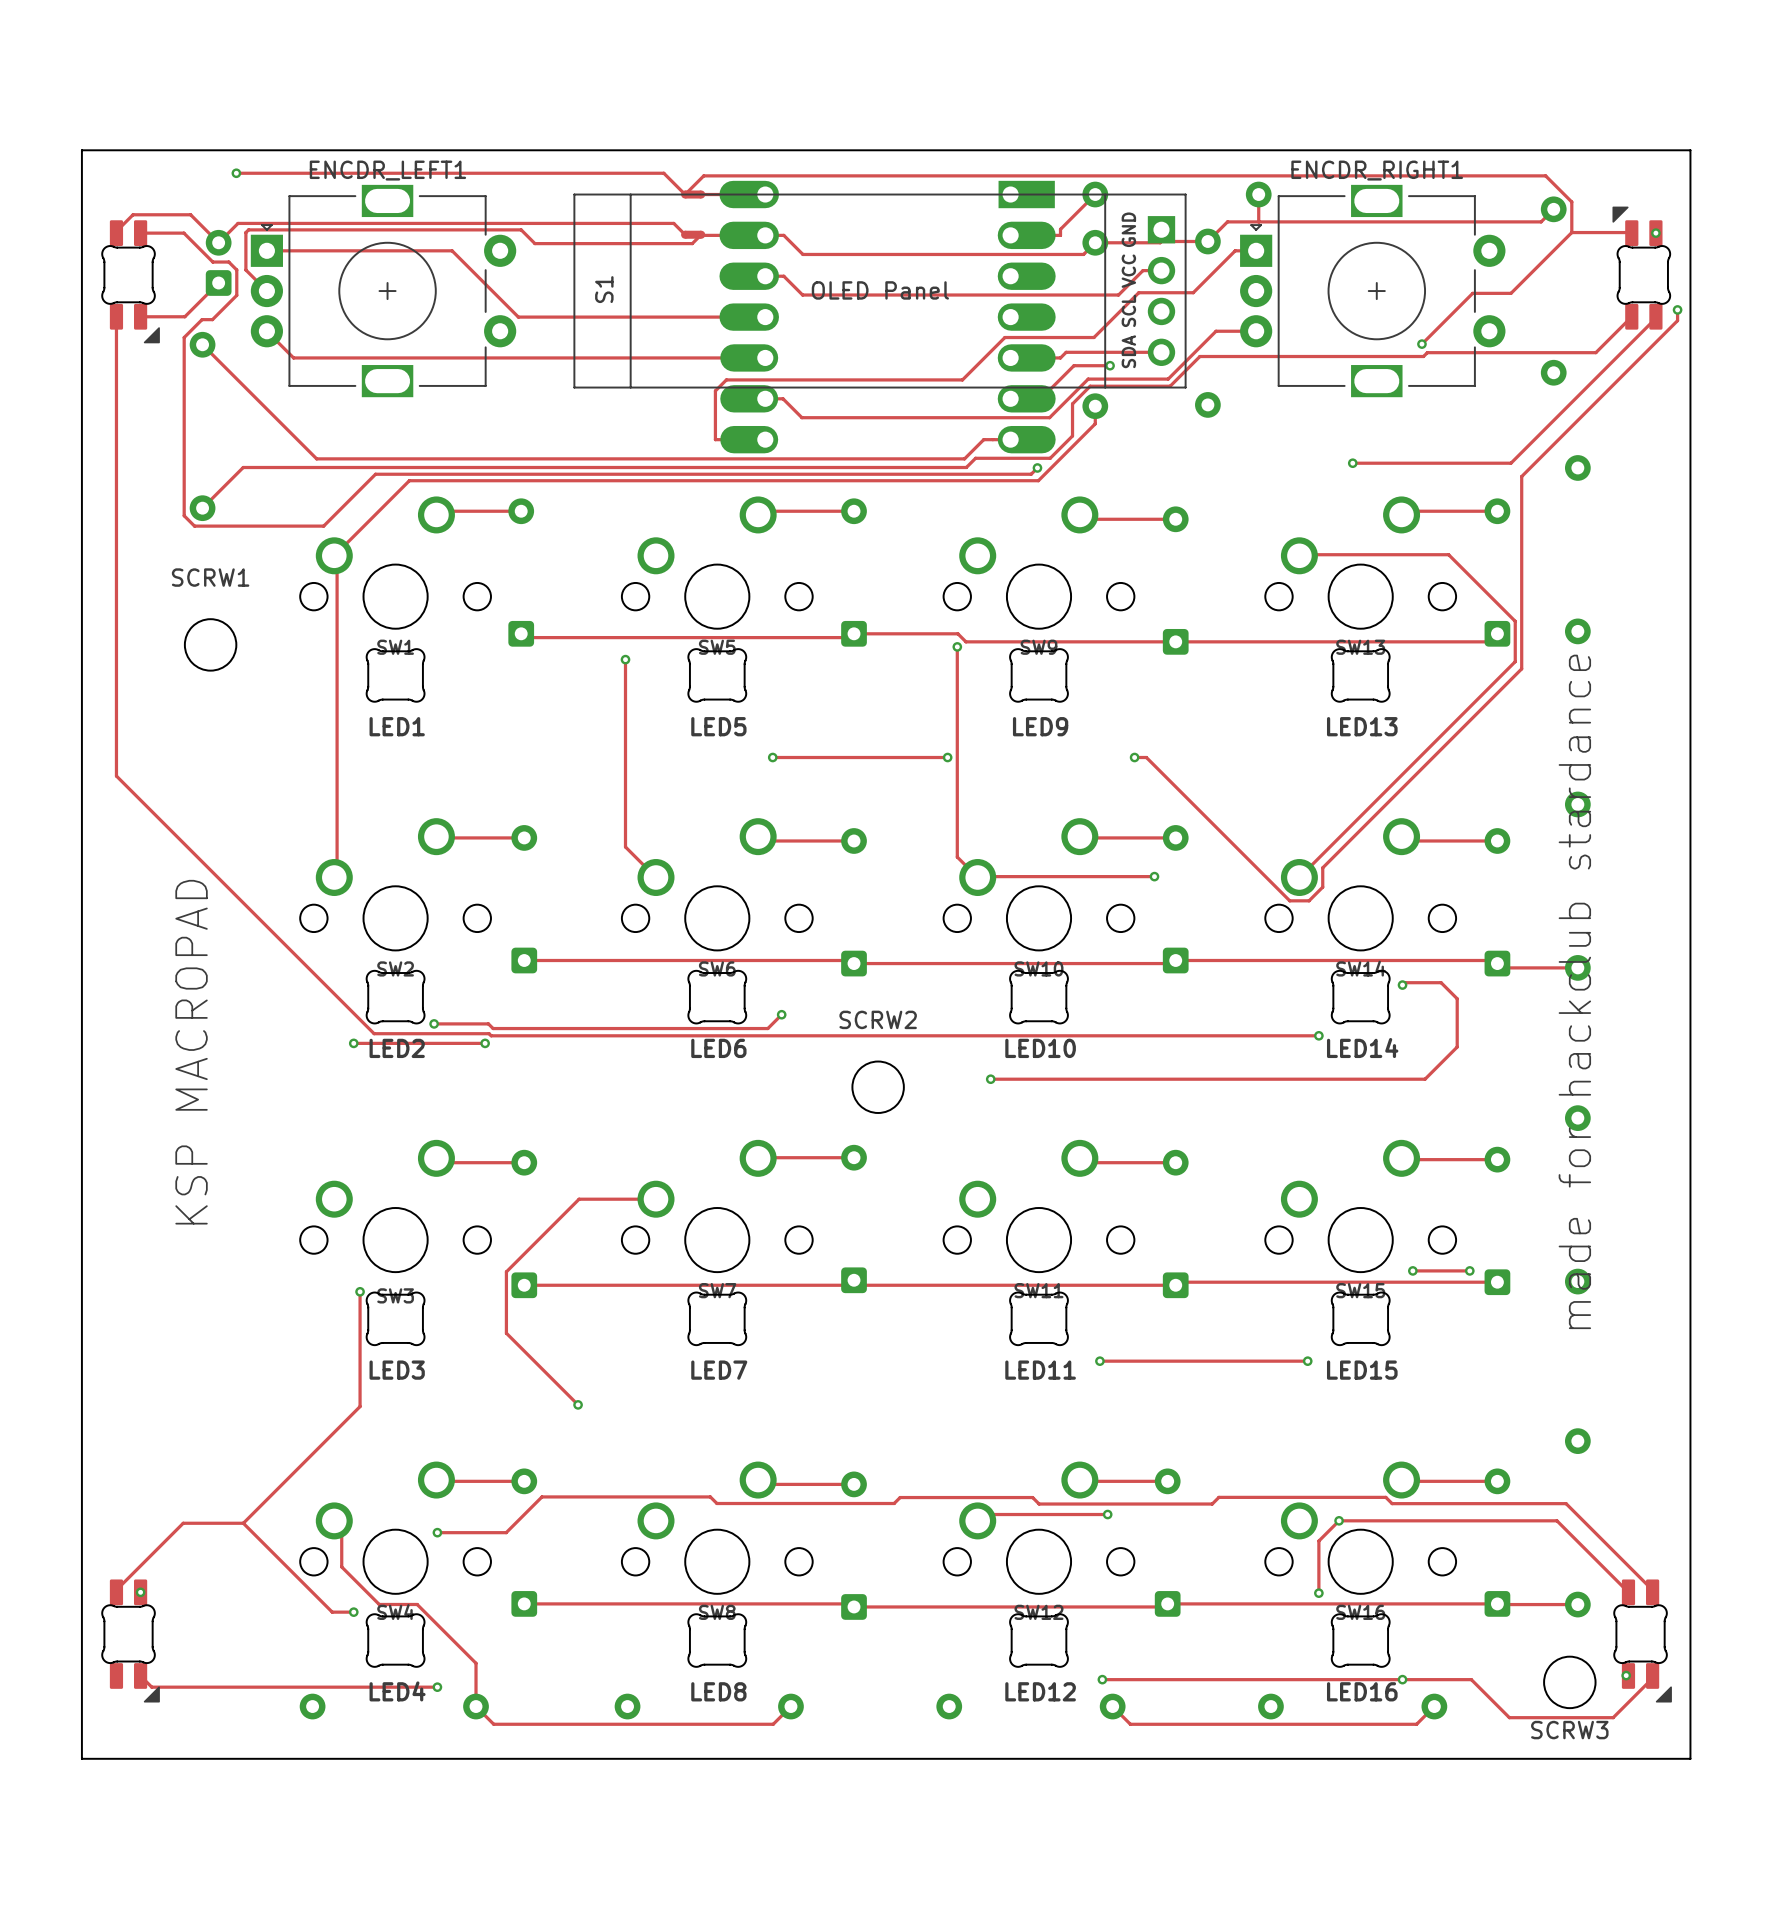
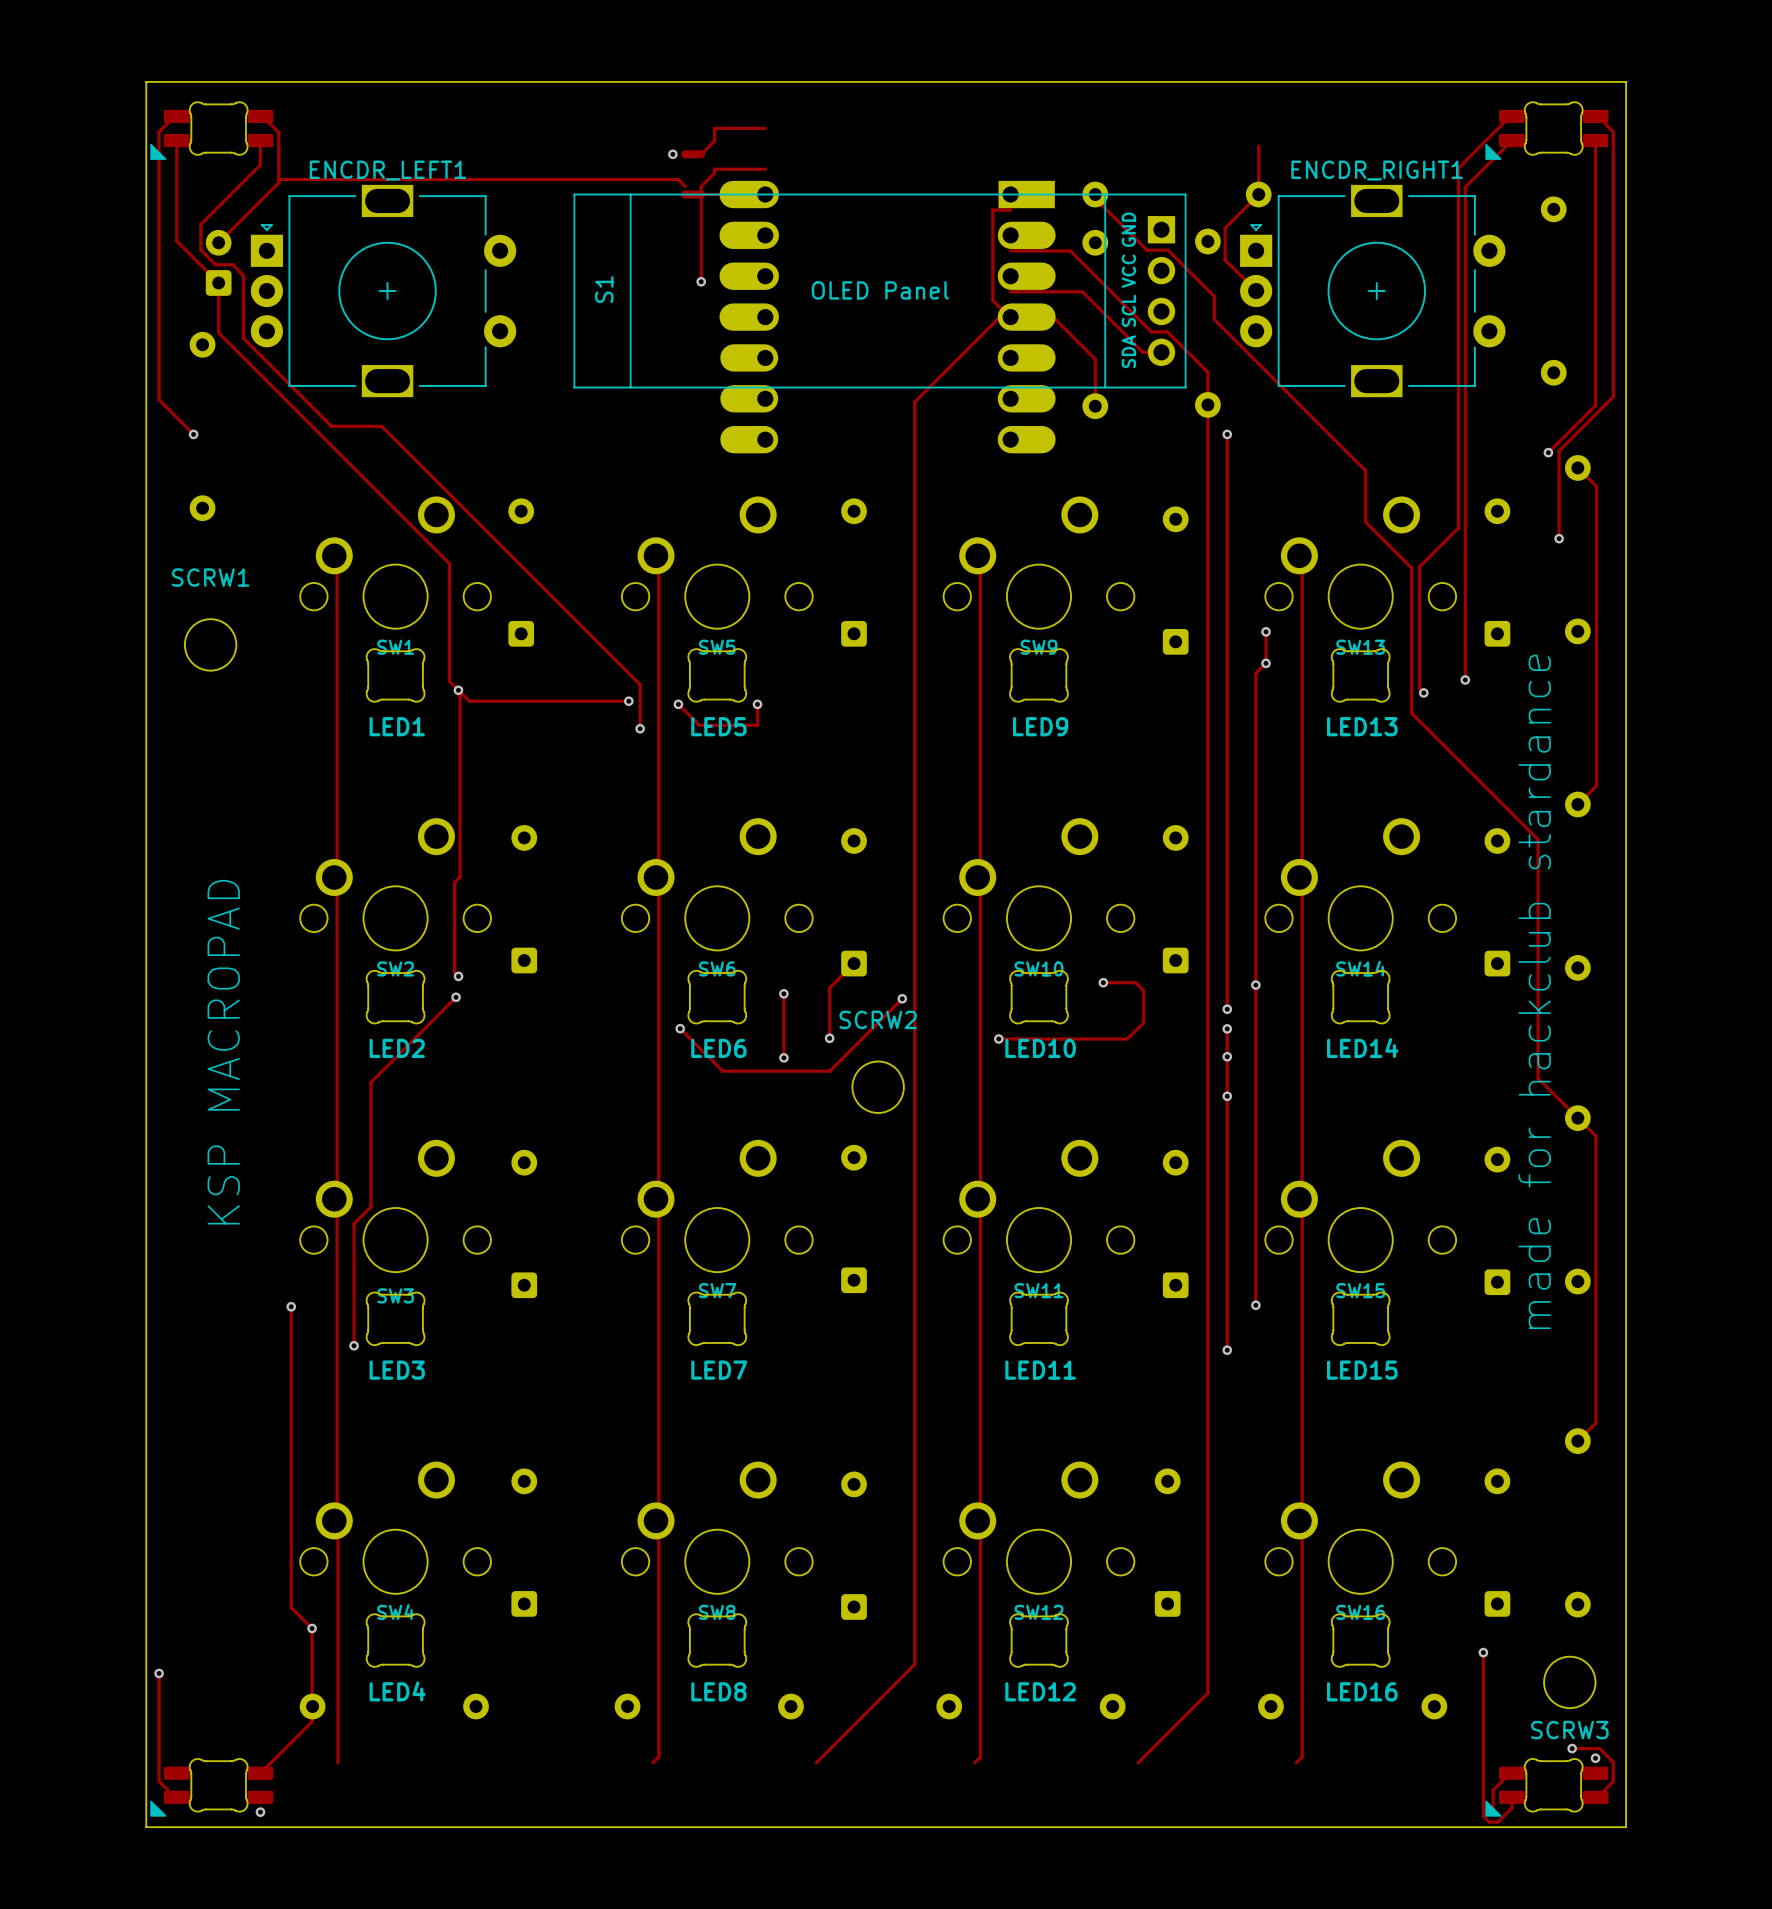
track: none -> (176, 116) (174, 116) (159, 131) (159, 399) (193, 434)
track: none -> (1511, 116) (1458, 168) (1458, 527) (1419, 566) (1419, 688) (1423, 692)
track: none -> (1595, 116) (1597, 116) (1613, 131) (1613, 396) (1559, 451) (1559, 538)
track: none -> (765, 128) (714, 128) (714, 140) (701, 154)
track: none -> (176, 140) (176, 241) (218, 282) (218, 332) (449, 563) (449, 681) (469, 701) (628, 701)
track: none -> (1511, 140) (1465, 187) (1465, 679)
track: none -> (1595, 140) (1595, 405) (1548, 452)
track: none -> (1258, 146) (1258, 194) (1225, 228) (1225, 259) (1256, 291)
board edge: (81, 150) (1690, 150) (1690, 1758) (81, 1758) (81, 150) -> (146, 81) (146, 1827) (1626, 1827) (1626, 81) (146, 81)
via: none -> (672, 154)
track: none -> (765, 169) (714, 169) (714, 173) (701, 186) (701, 281)
track: (236, 173) (663, 173) (685, 194) (703, 175) (1545, 175) (1571, 202) (1571, 232) -> none
via: (236, 173) -> none
track: none -> (278, 179) (678, 179) (685, 186)
track: (1095, 194) (1060, 229) (1060, 235) (1010, 235) -> (1095, 194) (1095, 198) (1147, 250) (1167, 250) (1214, 296) (1214, 319) (1365, 470) (1365, 521) (1411, 568) (1411, 713) (1538, 839) (1538, 1078) (1595, 1136) (1595, 1423) (1577, 1441)
track: (1258, 194) (1258, 221) -> none
track: (1553, 209) (1541, 221) (1227, 221) (1207, 241) (1161, 241) -> none
track: none -> (1010, 210) (992, 210) (992, 300) (1004, 312)
track: (238, 223) (673, 223) (685, 234) -> (238, 223) (278, 182) (278, 132) (262, 116) (260, 116)
track: (1571, 232) (1511, 293) (1472, 293) (1421, 344) -> none
track: (1571, 232) (1631, 233) -> none
track: (116, 233) (133, 214) (190, 214) (218, 242) -> none
track: (140, 233) (183, 233) (200, 250) -> (260, 140) (260, 164) (200, 224) (200, 250)
via: (1655, 233) -> none
part position: (693, 234) -> (693, 154)
track: (1161, 241) (1095, 242) (1083, 254) (802, 254) (783, 235) (701, 234) (692, 243) (534, 243) (521, 229) (248, 229) (245, 232) (245, 270) (266, 291) -> none
track: (266, 250) (452, 250) (518, 317) (765, 317) -> none
track: none -> (1010, 250) (1070, 250) (1151, 331) (1167, 331) (1207, 372) (1207, 1693) (1138, 1762)
track: (1256, 250) (1235, 250) (1193, 292) (1138, 292) (1093, 337) (1004, 337) (962, 379) (726, 379) (715, 390) (715, 439) (765, 439) -> none
track: (212, 262) (228, 262) (236, 269) (236, 295) (212, 319) (202, 319) (184, 337) (184, 515) (194, 526) (323, 526) (375, 474) (1031, 474) (1037, 467) -> (212, 262) (215, 264) (232, 264) (243, 275) (243, 338) (331, 426) (381, 426) (640, 684) (640, 728)
part rotation: 0° (1641, 268) -> 90° counterclockwise (1546, 130)
part position: (1641, 268) -> (1546, 130)
track: (1161, 270) (1142, 270) (1118, 295) (802, 295) (783, 276) (765, 276) -> none
part rotation: 0° (130, 281) -> 90° clockwise (211, 130)
part position: (130, 281) -> (211, 130)
via: none -> (701, 281)
track: (218, 282) (184, 316) (140, 316) -> none
track: (1677, 309) (1677, 320) (1521, 476) (1521, 668) (1322, 867) (1322, 887) (1309, 900) (1289, 900) (1146, 757) (1134, 757) -> none
via: (1677, 309) -> none
track: none -> (1004, 312) (914, 402) (914, 1664) (816, 1762)
track: (116, 316) (116, 776) (374, 1033) (489, 1033) (491, 1035) (1318, 1035) -> none
track: (1631, 316) (1595, 352) (1427, 352) (1423, 356) (1199, 356) (1170, 386) (1090, 386) (1072, 403) (1072, 435) (1050, 458) (975, 458) (966, 467) (243, 467) (202, 508) -> none
track: (1655, 316) (1510, 463) (1352, 463) -> none
track: (266, 331) (293, 357) (765, 357) -> none
track: (1256, 331) (1216, 331) (1168, 379) (1088, 379) (1049, 417) (801, 417) (783, 398) (765, 398) -> none
track: (202, 344) (316, 458) (964, 458) (983, 439) (1010, 439) -> none
via: (1421, 344) -> none
track: (1142, 352) (1066, 352) (1060, 357) (1010, 357) -> (1142, 352) (1082, 291) (1010, 291)
track: (1110, 365) (1073, 365) (1040, 398) (1010, 398) -> none
via: (1110, 365) -> none
track: (1095, 406) (1095, 423) (1038, 480) (409, 480) (334, 555) -> (1095, 406) (1095, 359) (1048, 312) (1004, 312)
via: none -> (193, 434)
track: none -> (1227, 434) (1227, 1009)
via: none -> (1227, 434)
via: none -> (1548, 452)
via: (1352, 463) -> none
via: (1037, 467) -> none
track: none -> (1577, 467) (1596, 486) (1596, 785) (1577, 804)
track: (521, 511) (440, 511) (436, 514) -> none
track: (854, 511) (761, 511) (758, 514) -> none
track: (1497, 511) (1405, 511) (1401, 514) -> none
track: (1079, 514) (1084, 519) (1175, 519) -> none
via: none -> (1559, 538)
track: none -> (656, 555) (658, 558) (658, 874) (656, 877) (658, 880) (658, 1196) (656, 1199) (658, 1201) (658, 1518) (656, 1520) (658, 1523) (658, 1756) (652, 1762)
track: (1299, 555) (1448, 554) (1515, 621) (1515, 661) (1302, 874) -> (1299, 555) (1302, 558) (1302, 874)
track: none -> (1266, 631) (1266, 663) (1255, 673) (1255, 1305)
via: none -> (1266, 631)
track: (521, 633) (525, 637) (850, 637) (854, 633) (957, 633) (965, 641) (1489, 641) (1497, 633) -> none
track: (957, 646) (957, 857) (977, 877) -> none
via: (957, 646) -> none
track: (625, 659) (625, 846) (656, 877) -> none
via: (625, 659) -> none
via: none -> (1266, 663)
via: none -> (1465, 679)
via: none -> (458, 690)
track: none -> (460, 691) (460, 877) (454, 882) (454, 972) (458, 976)
via: none -> (1423, 692)
via: none -> (628, 701)
track: none -> (678, 704) (699, 725) (757, 725) (757, 704)
via: none -> (678, 704)
via: none -> (757, 704)
via: none -> (640, 728)
track: (772, 757) (947, 757) -> none
via: (772, 757) -> none
via: (947, 757) -> none
via: (1134, 757) -> none
track: (436, 836) (524, 837) -> none
track: (758, 836) (762, 840) (854, 840) -> none
track: (1079, 836) (1175, 837) -> none
track: (1401, 836) (1405, 840) (1497, 840) -> none
track: (978, 876) (1154, 876) -> (978, 876) (980, 874) (980, 558) (977, 555)
via: (1154, 876) -> none
track: none -> (334, 877) (337, 880) (337, 1196) (334, 1199) (337, 1201) (337, 1518) (334, 1520)
track: none -> (1299, 877) (1302, 880) (1302, 1196) (1299, 1199) (1302, 1201) (1302, 1518) (1299, 1520) (1302, 1523) (1302, 1756) (1296, 1762)
track: (524, 960) (850, 960) (854, 963) (1172, 963) (1175, 960) (1494, 960) (1501, 967) (1577, 967) -> none
track: none -> (854, 963) (829, 987) (829, 1038)
via: none -> (458, 976)
track: none -> (1103, 982) (1135, 982) (1143, 990) (1143, 1022) (1127, 1039) (998, 1039)
via: none -> (1103, 982)
via: none -> (1255, 985)
track: (1402, 985) (1404, 982) (1441, 982) (1457, 998) (1457, 1047) (1425, 1079) (990, 1079) -> none
via: (1402, 985) -> none
text position: made for hackclub stardance (1574, 991) -> made for hackclub stardance (1534, 991)
track: none -> (783, 993) (783, 1057)
track: none -> (456, 997) (370, 1082) (370, 1206) (354, 1223) (354, 1345)
via: none -> (456, 997)
track: none -> (902, 998) (829, 1071) (722, 1071) (680, 1028)
via: none -> (902, 998)
via: none -> (1227, 1009)
track: (781, 1014) (767, 1028) (493, 1028) (488, 1023) (434, 1023) -> none
via position: (781, 1014) -> (783, 993)
via: (434, 1023) -> none
via: none -> (680, 1028)
track: none -> (1227, 1028) (1227, 1350)
via: none -> (1227, 1028)
via: (1318, 1035) -> none
via: none -> (829, 1038)
track: (353, 1043) (485, 1043) -> none
via: (353, 1043) -> none
via: (485, 1043) -> none
text position: KSP MACROPAD (191, 1052) -> KSP MACROPAD (223, 1052)
via: none -> (1227, 1056)
via: none -> (783, 1057)
via position: (990, 1079) -> (998, 1039)
via: none -> (1227, 1096)
track: (854, 1157) (758, 1158) -> none
track: (436, 1158) (440, 1162) (524, 1162) -> none
track: (1079, 1158) (1084, 1162) (1175, 1162) -> none
track: (1401, 1158) (1497, 1159) -> none
track: (656, 1199) (579, 1199) (506, 1271) (506, 1333) (578, 1404) -> none
track: (1412, 1270) (1469, 1270) -> none
via: (1412, 1270) -> none
via: (1469, 1270) -> none
track: (1497, 1282) (1178, 1282) (1175, 1285) (859, 1285) (854, 1280) (849, 1285) (524, 1285) -> none
track: (360, 1291) (360, 1406) (243, 1523) -> none
via: (360, 1291) -> none
via: none -> (1255, 1305)
track: none -> (291, 1306) (291, 1607) (312, 1628) (312, 1721) (260, 1773)
via: none -> (291, 1306)
via: none -> (354, 1345)
via: none -> (1227, 1350)
track: (1099, 1361) (1307, 1361) -> none
via: (1099, 1361) -> none
via: (1307, 1361) -> none
via: (578, 1404) -> none
track: (436, 1480) (524, 1481) -> none
track: (758, 1480) (762, 1484) (854, 1484) -> none
track: (1079, 1480) (1167, 1481) -> none
track: (1401, 1480) (1497, 1481) -> none
track: (1107, 1514) (984, 1514) (980, 1518) -> (977, 877) (980, 880) (980, 1196) (977, 1199) (980, 1201) (980, 1518)
via: (1107, 1514) -> none
track: none -> (977, 1520) (980, 1523) (980, 1756) (974, 1762)
via: (1339, 1520) -> none
track: (243, 1523) (332, 1612) (353, 1612) -> none
track: (243, 1523) (183, 1523) (116, 1590) (116, 1592) -> none
track: (338, 1524) (341, 1528) (341, 1566) (379, 1604) (417, 1604) (476, 1663) (476, 1706) (493, 1724) (773, 1724) (790, 1706) -> (338, 1524) (338, 1762)
track: (437, 1532) (506, 1532) (541, 1496) (710, 1496) (716, 1503) (894, 1503) (900, 1497) (1032, 1497) (1039, 1504) (1212, 1504) (1218, 1497) (1385, 1497) (1392, 1503) (1566, 1503) (1652, 1590) (1652, 1592) -> none
via: (437, 1532) -> none
via position: (140, 1592) -> (159, 1673)
track: (1628, 1592) (1556, 1520) (1339, 1520) (1318, 1541) (1318, 1593) -> none
via: (1318, 1593) -> none
track: (524, 1603) (850, 1603) (854, 1606) (1164, 1606) (1167, 1603) (1577, 1604) -> none
via position: (353, 1612) -> (312, 1628)
part rotation: 0° (130, 1640) -> 90° clockwise (211, 1787)
part position: (130, 1640) -> (211, 1787)
part rotation: 0° (1642, 1640) -> 90° clockwise (1546, 1787)
part position: (1642, 1640) -> (1546, 1787)
track: none -> (1483, 1652) (1483, 1816) (1489, 1821) (1497, 1821) (1511, 1808) (1511, 1797)
via: none -> (1483, 1652)
track: none -> (159, 1673) (159, 1781) (176, 1797)
track: (140, 1675) (151, 1687) (437, 1687) -> none
via: (1626, 1675) -> none
track: (1652, 1675) (1652, 1678) (1613, 1717) (1509, 1717) (1471, 1679) (1102, 1679) -> none
via: (1102, 1679) -> none
via: (1402, 1679) -> none
via: (437, 1687) -> none
track: (1112, 1706) (1130, 1724) (1416, 1724) (1434, 1706) -> none
track: none -> (1572, 1748) (1599, 1748) (1613, 1762) (1613, 1781) (1595, 1797)
via: none -> (1572, 1748)
via: none -> (1595, 1758)
track: none -> (1511, 1773) (1493, 1790) (1493, 1812)
via: none -> (260, 1812)

